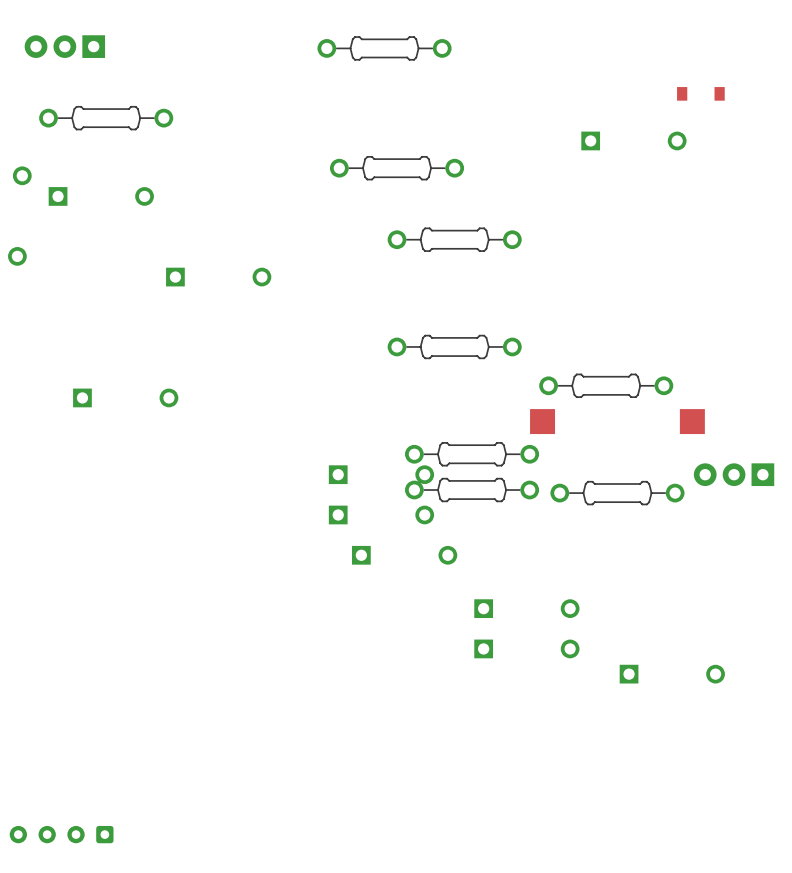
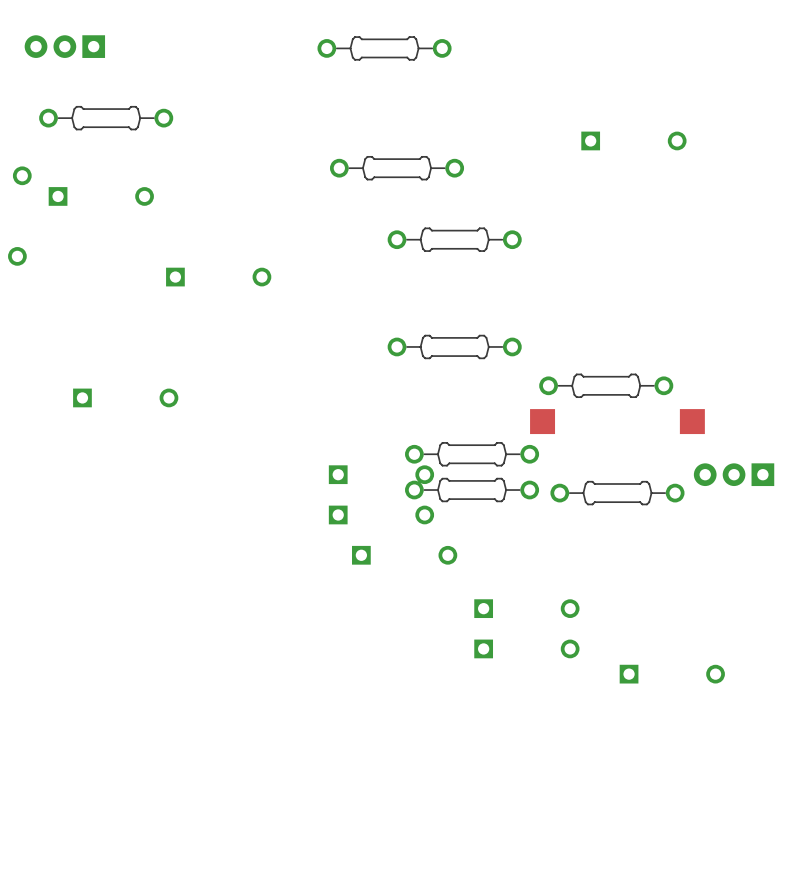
part: (700, 93) -> none
part: (61, 834) -> none

